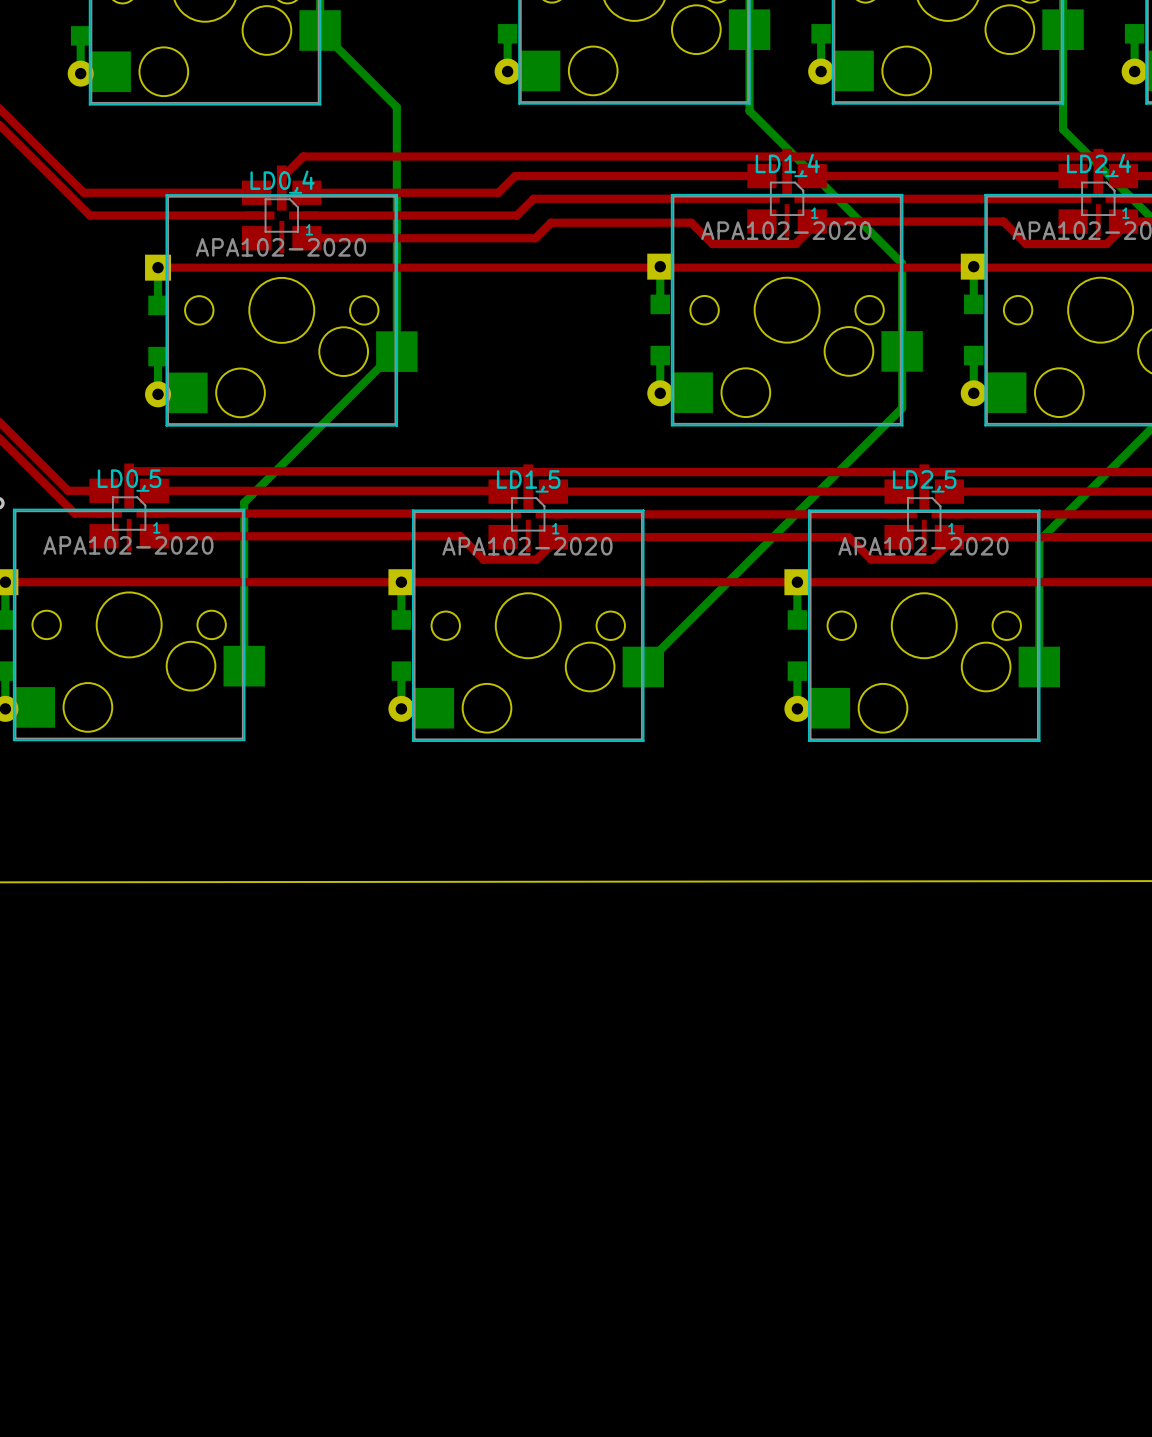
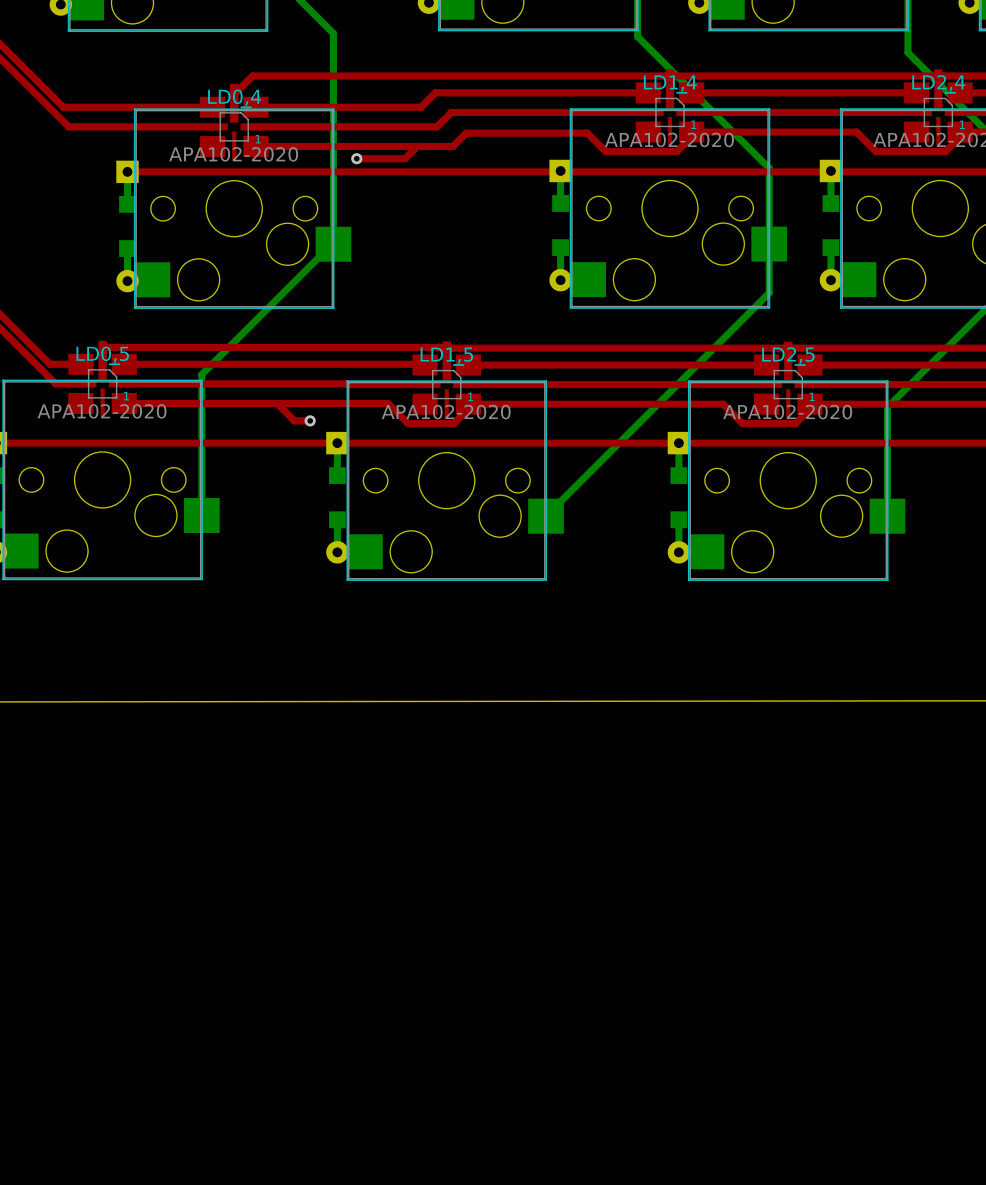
top track: none -> (417, 146) (405, 158) (356, 158)
via: none -> (356, 158)
top track: none -> (277, 403) (294, 420) (310, 420)
via: none -> (310, 420)

